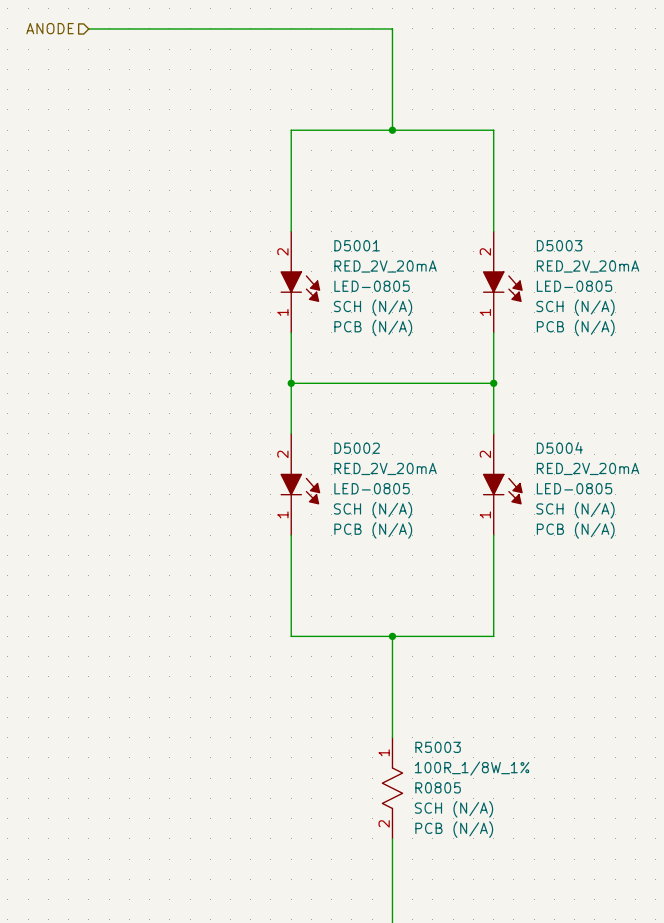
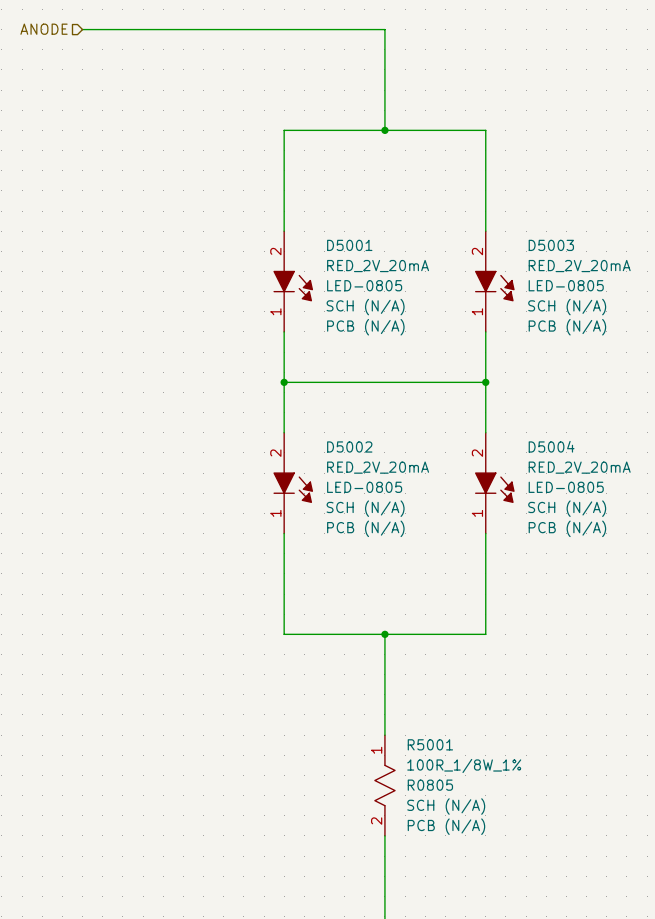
R5003 name: R5003 (438, 747) -> R5001 (430, 744)

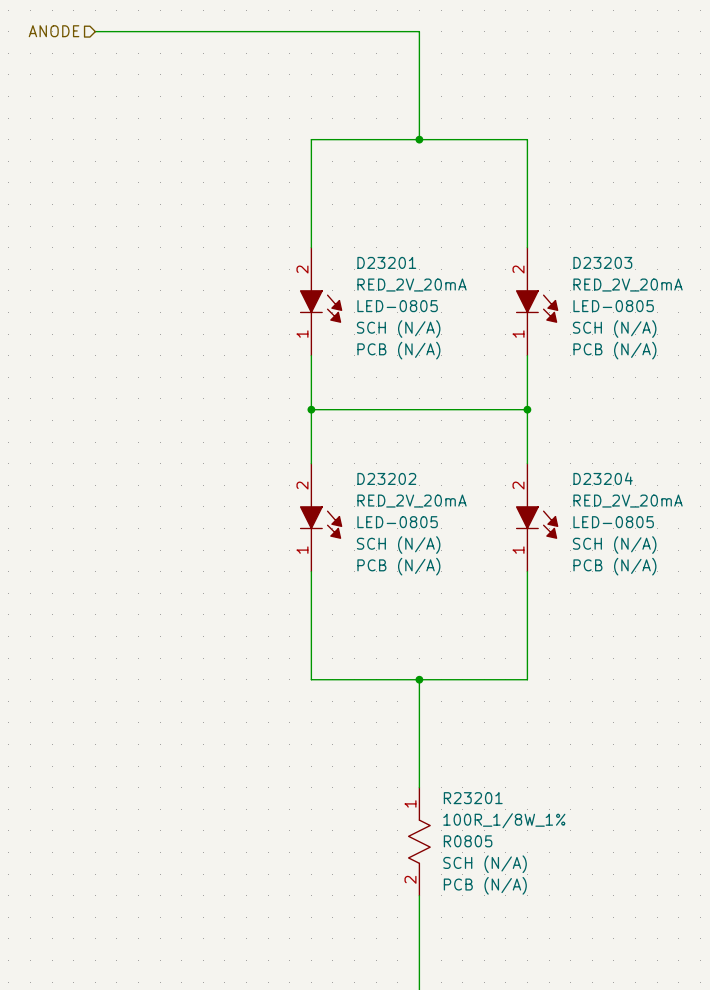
D5001 name: D5001 (349, 245) -> D23201 (386, 262)
D5003 name: D5003 (551, 245) -> D23203 (602, 262)
D5002 name: D5002 (349, 446) -> D23202 (386, 478)
D5004 name: D5004 (551, 446) -> D23204 (603, 478)
R5001 name: R5001 (430, 744) -> R23201 (473, 798)

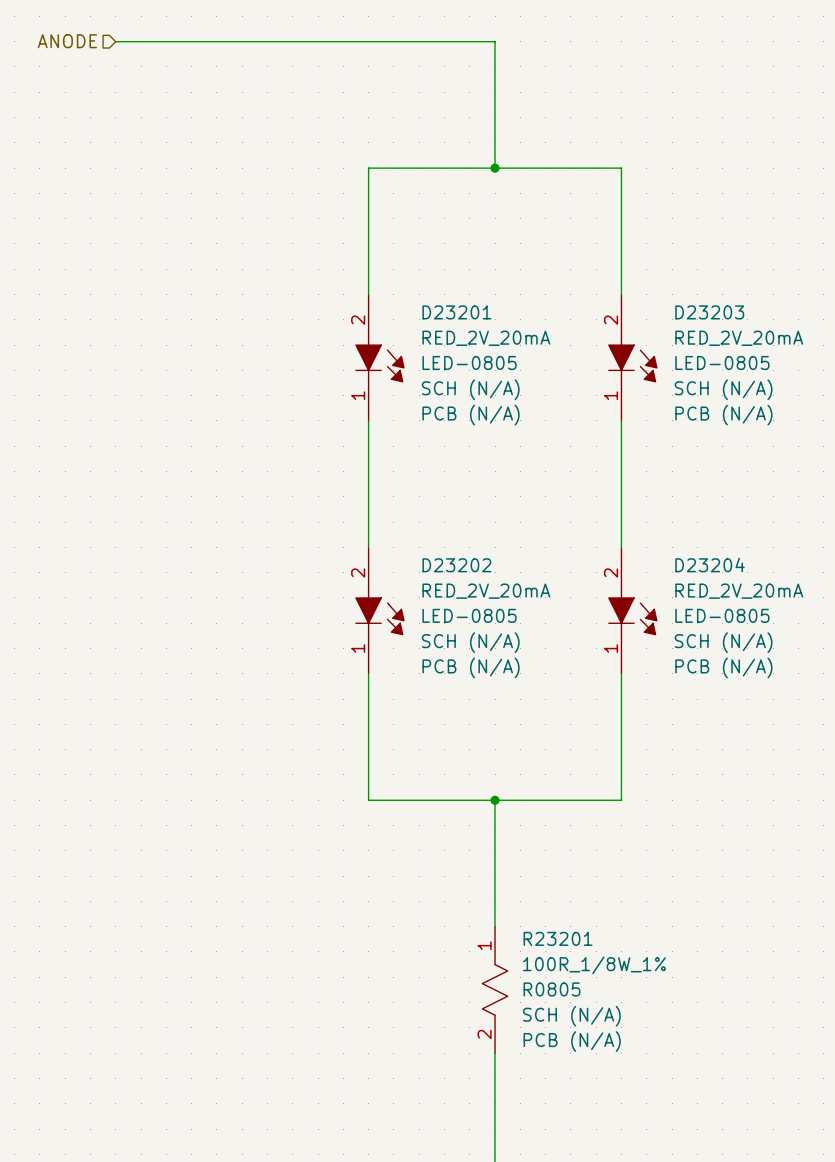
wire: (311, 409) (527, 409) -> none
junction: (311, 409) -> none
junction: (527, 409) -> none

